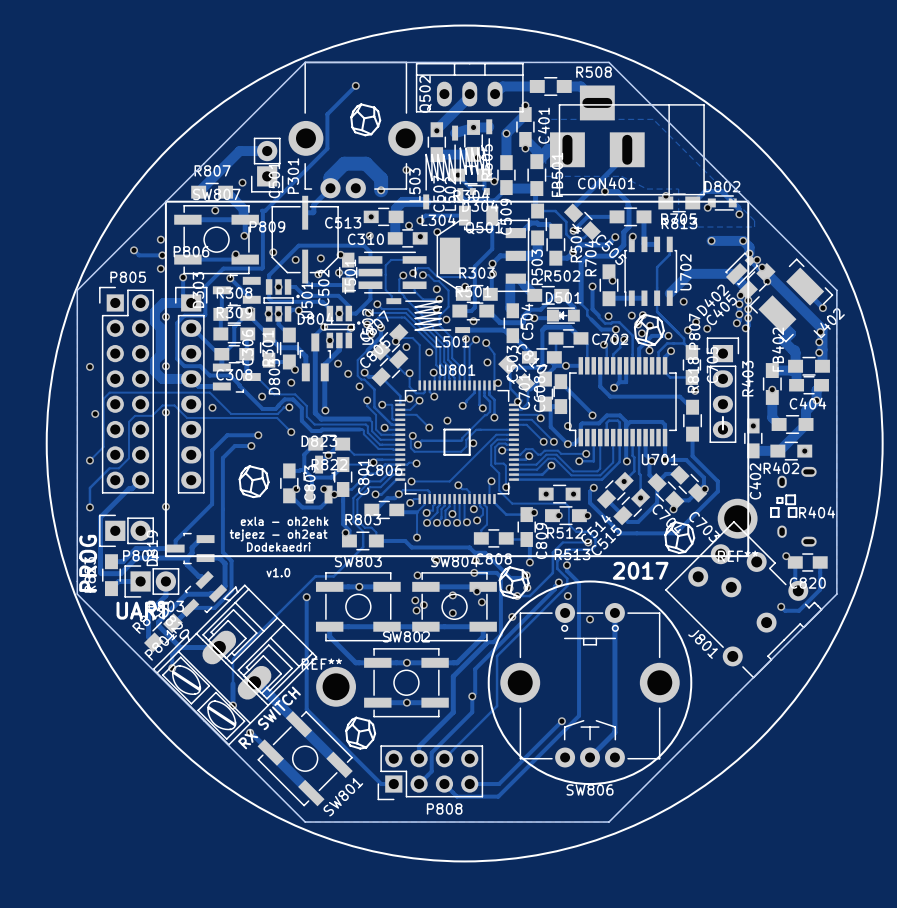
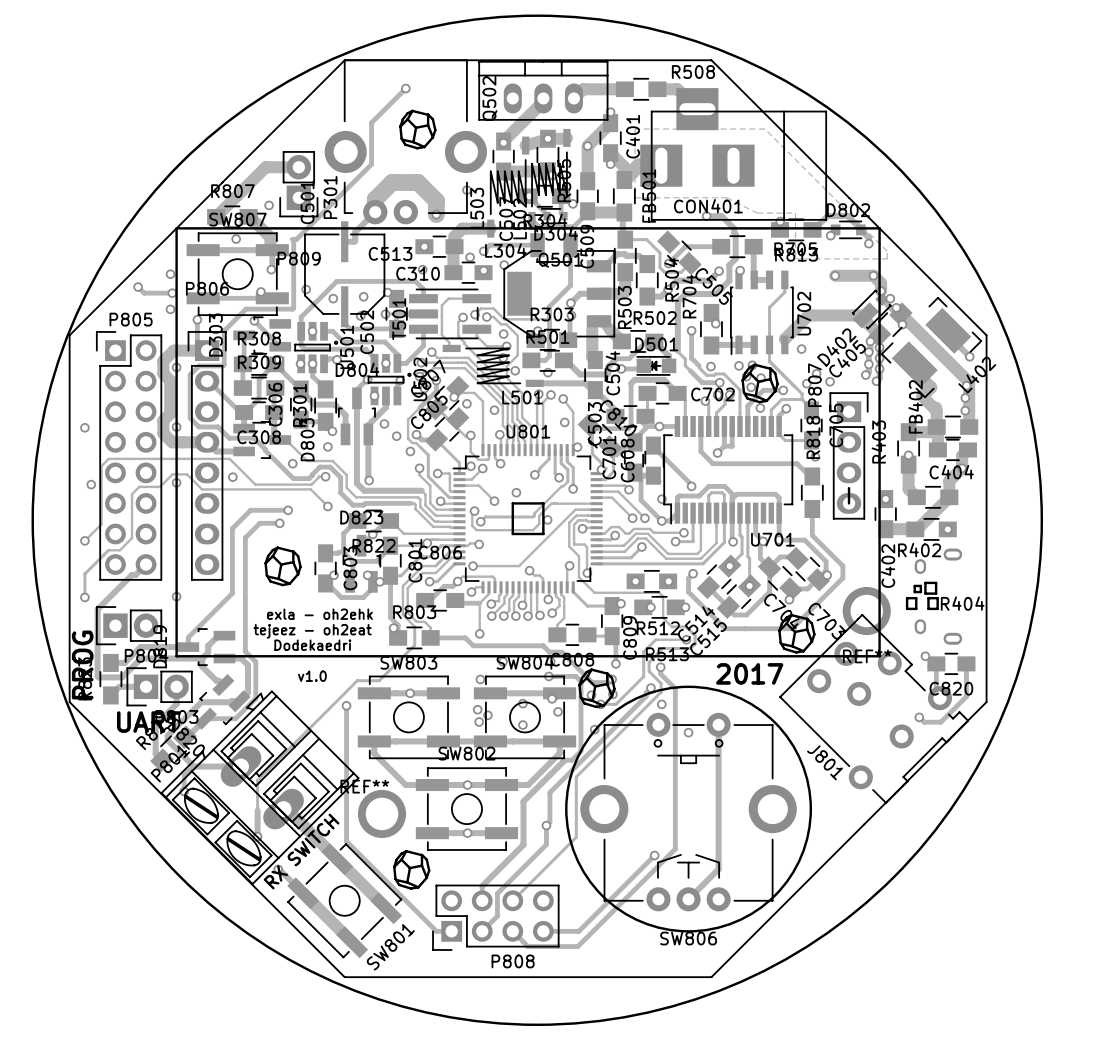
track: (627, 154) (569, 211) -> none

